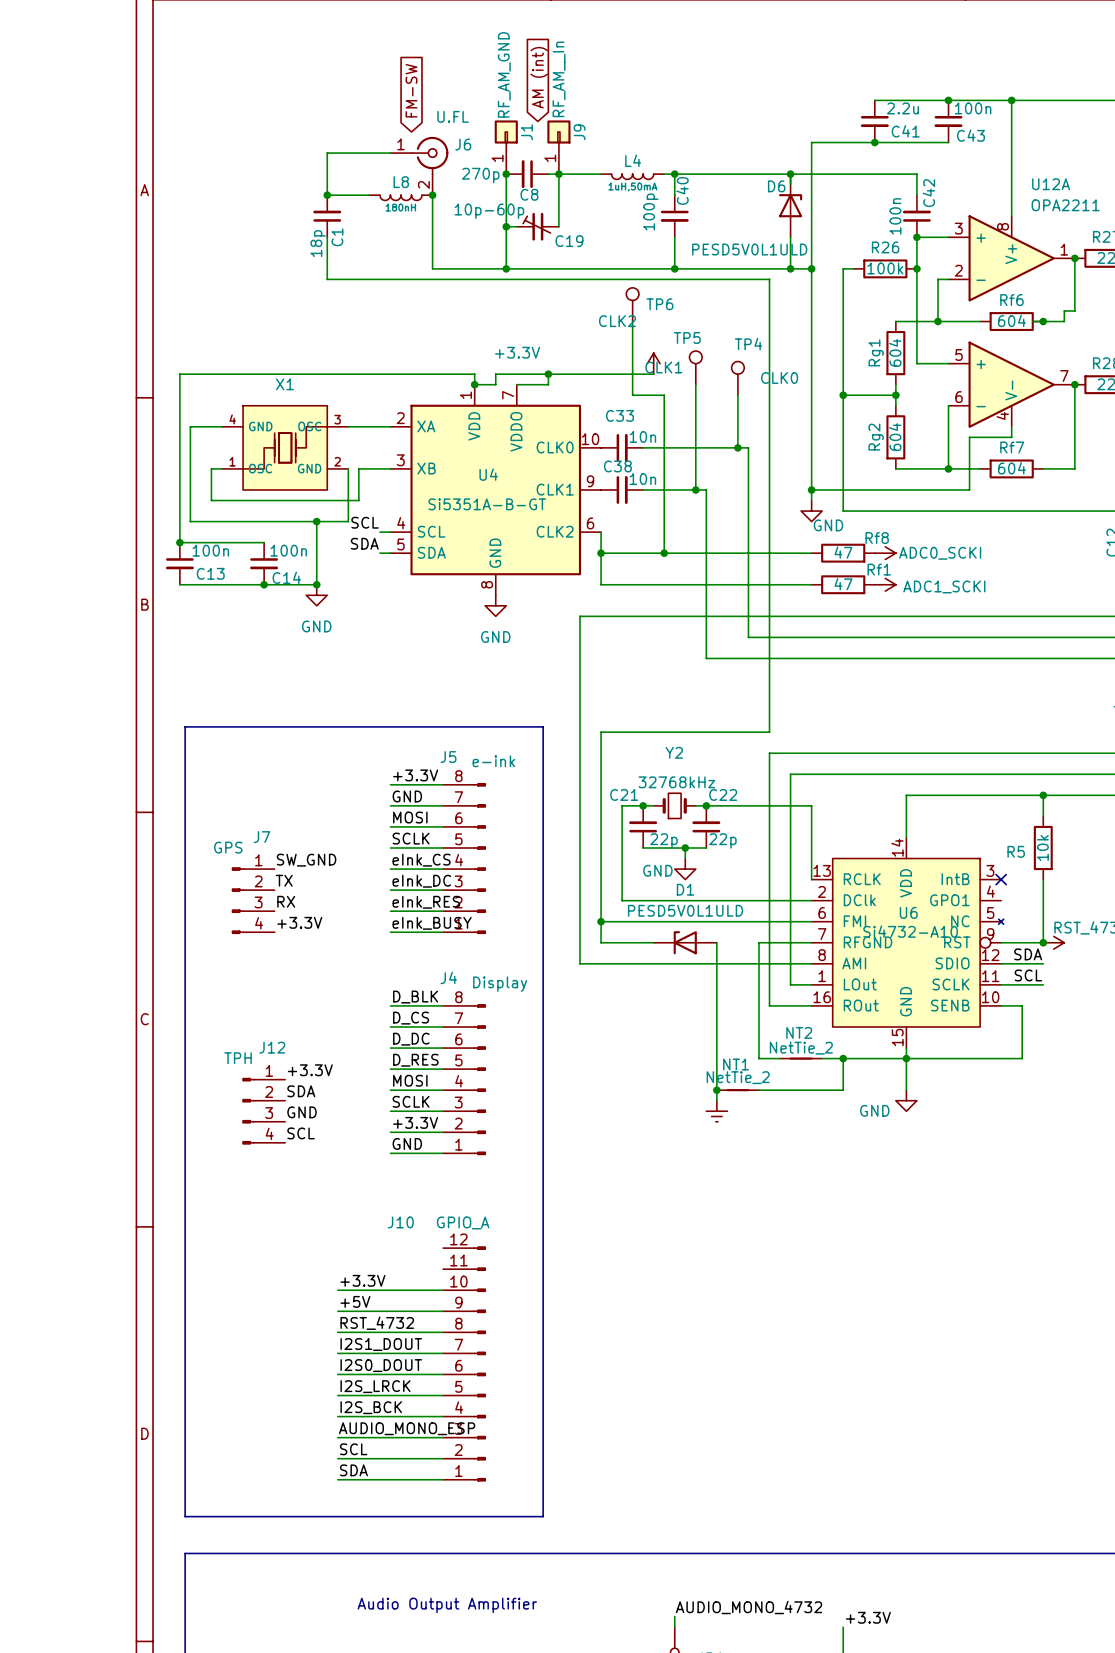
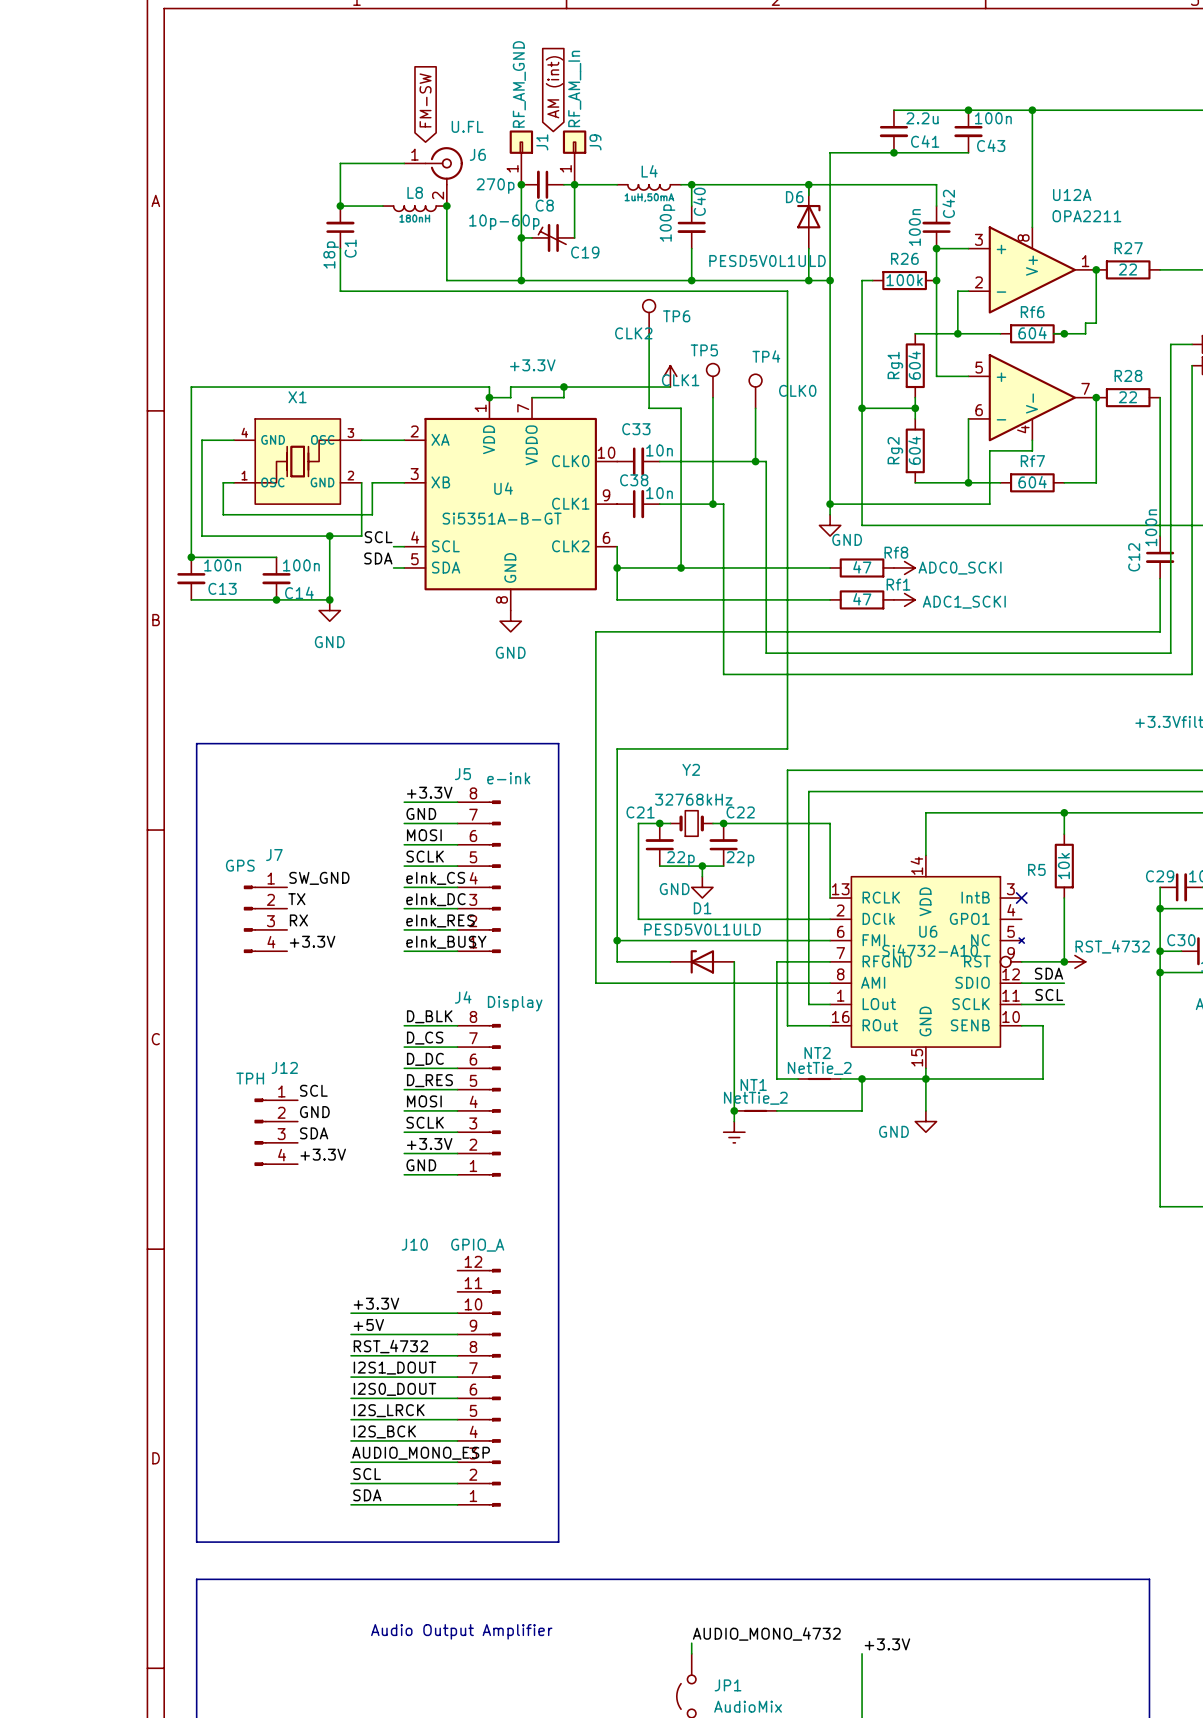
label: +3.3V (310, 1070) -> SCL (313, 1090)
label: SDA (301, 1091) -> GND (314, 1112)
label: GND (302, 1112) -> SDA (314, 1133)
label: SCL (301, 1133) -> +3.3V (323, 1154)

